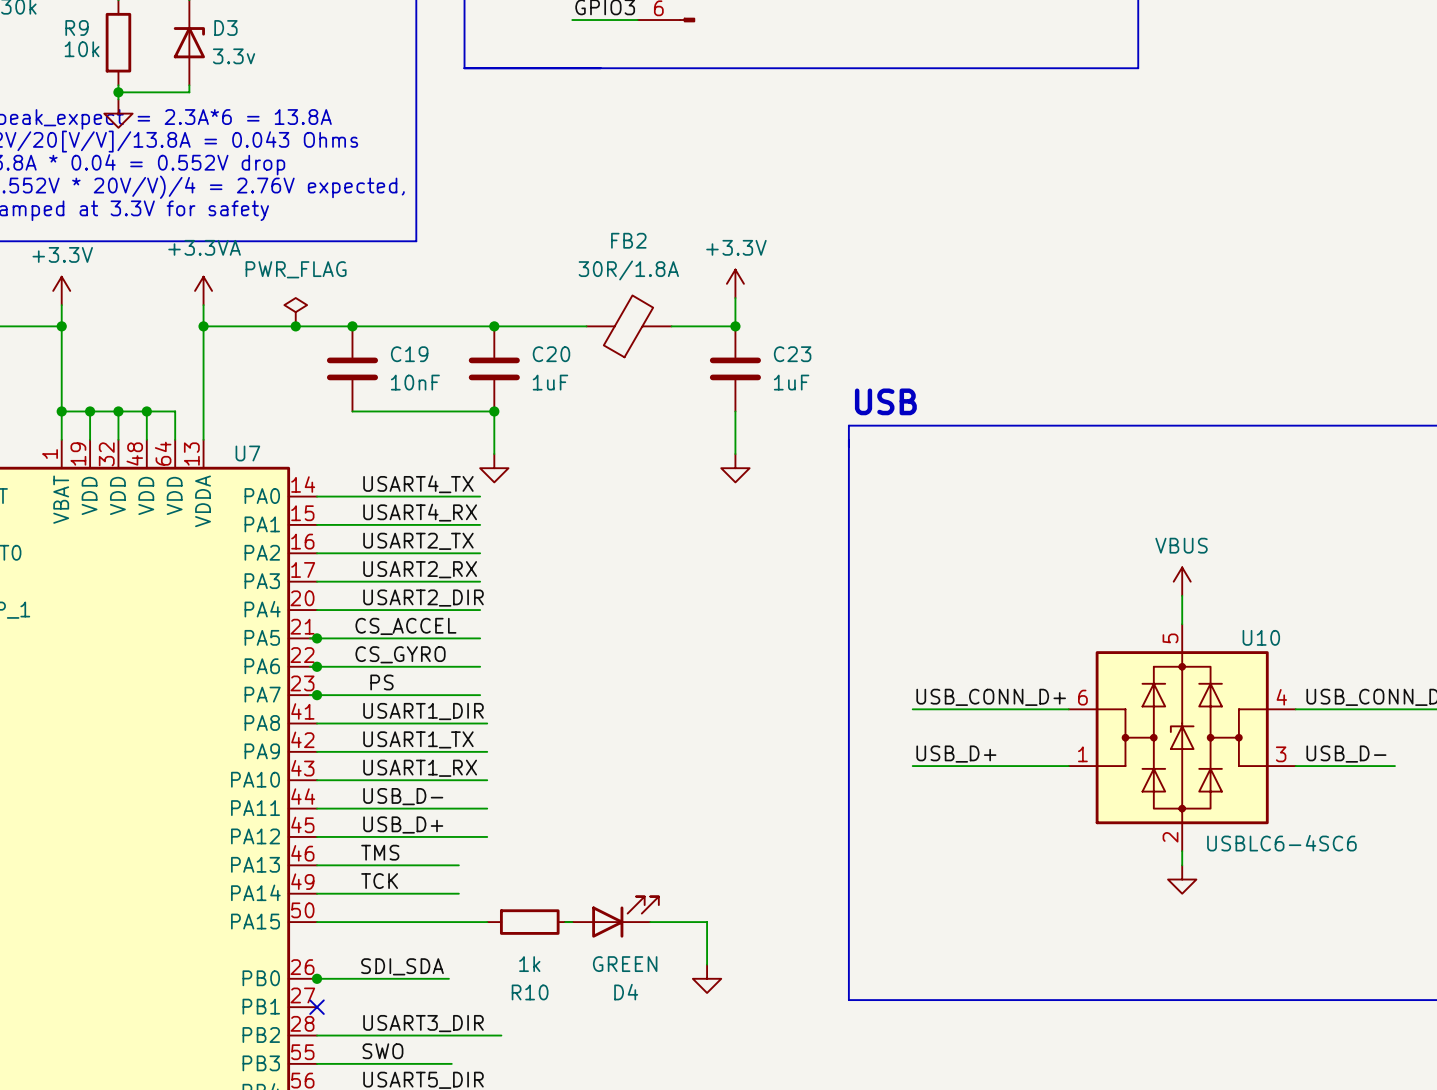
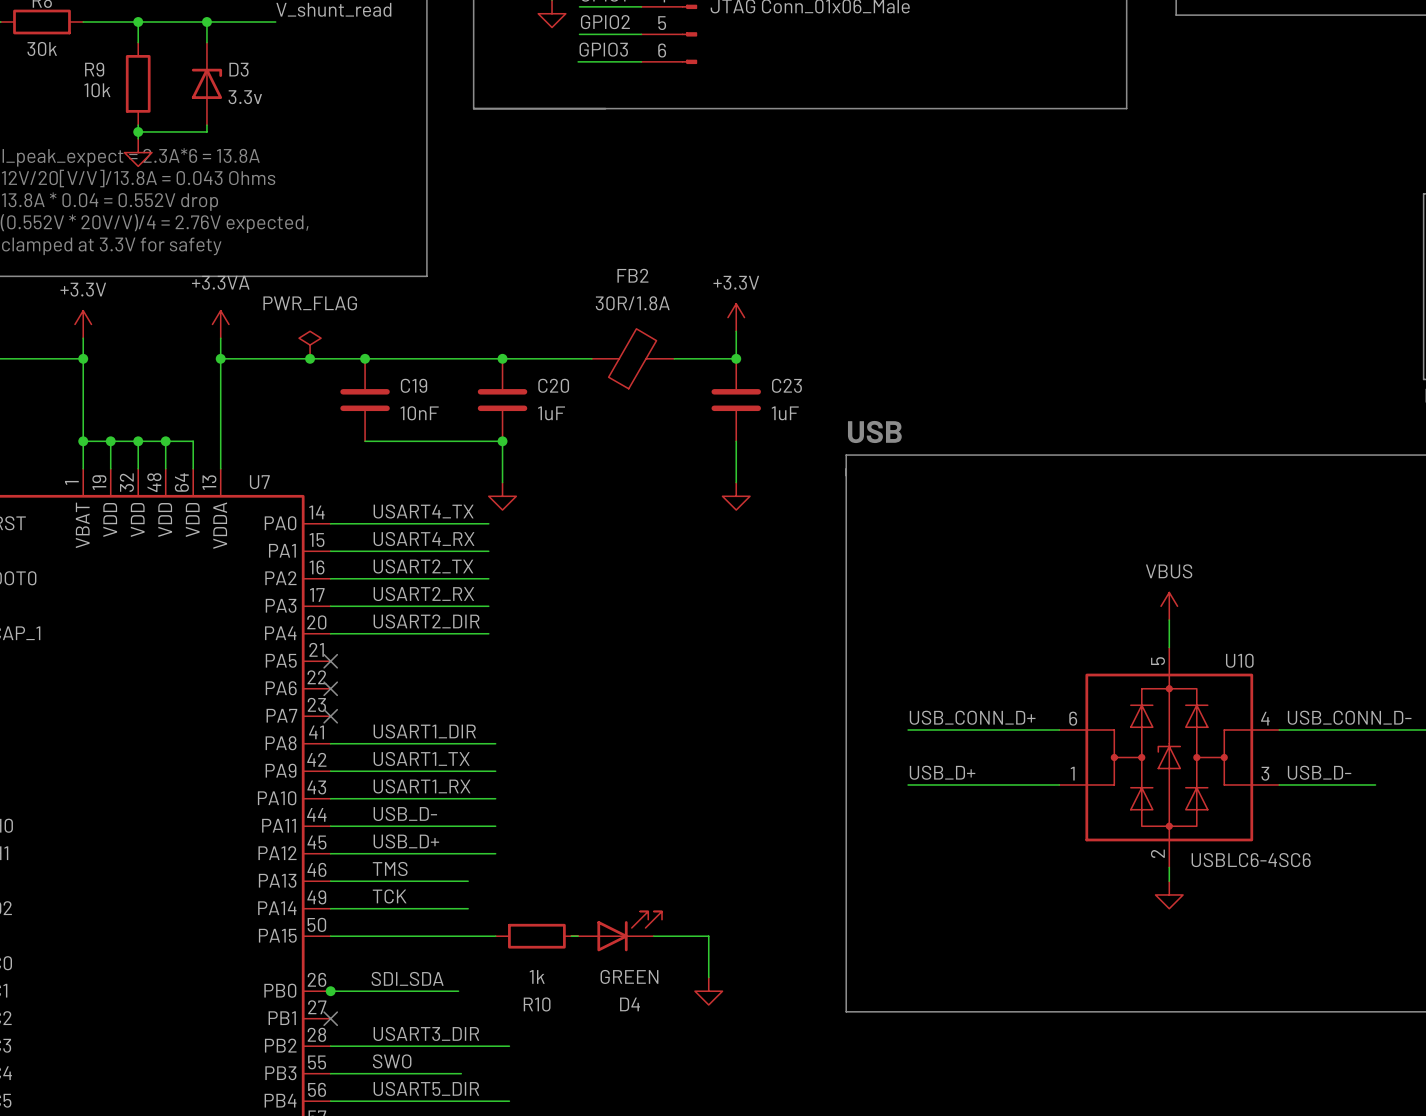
label: CS_ACCEL (405, 626) -> none
wire: (309, 638) (480, 638) -> none
junction: (317, 638) -> none
no-connect mark: none -> (330, 661)
label: CS_GYRO (400, 654) -> none
wire: (309, 666) (480, 666) -> none
junction: (317, 666) -> none
no-connect mark: none -> (330, 688)
label: PS (381, 682) -> none
wire: (309, 695) (480, 695) -> none
junction: (317, 695) -> none
no-connect mark: none -> (330, 716)

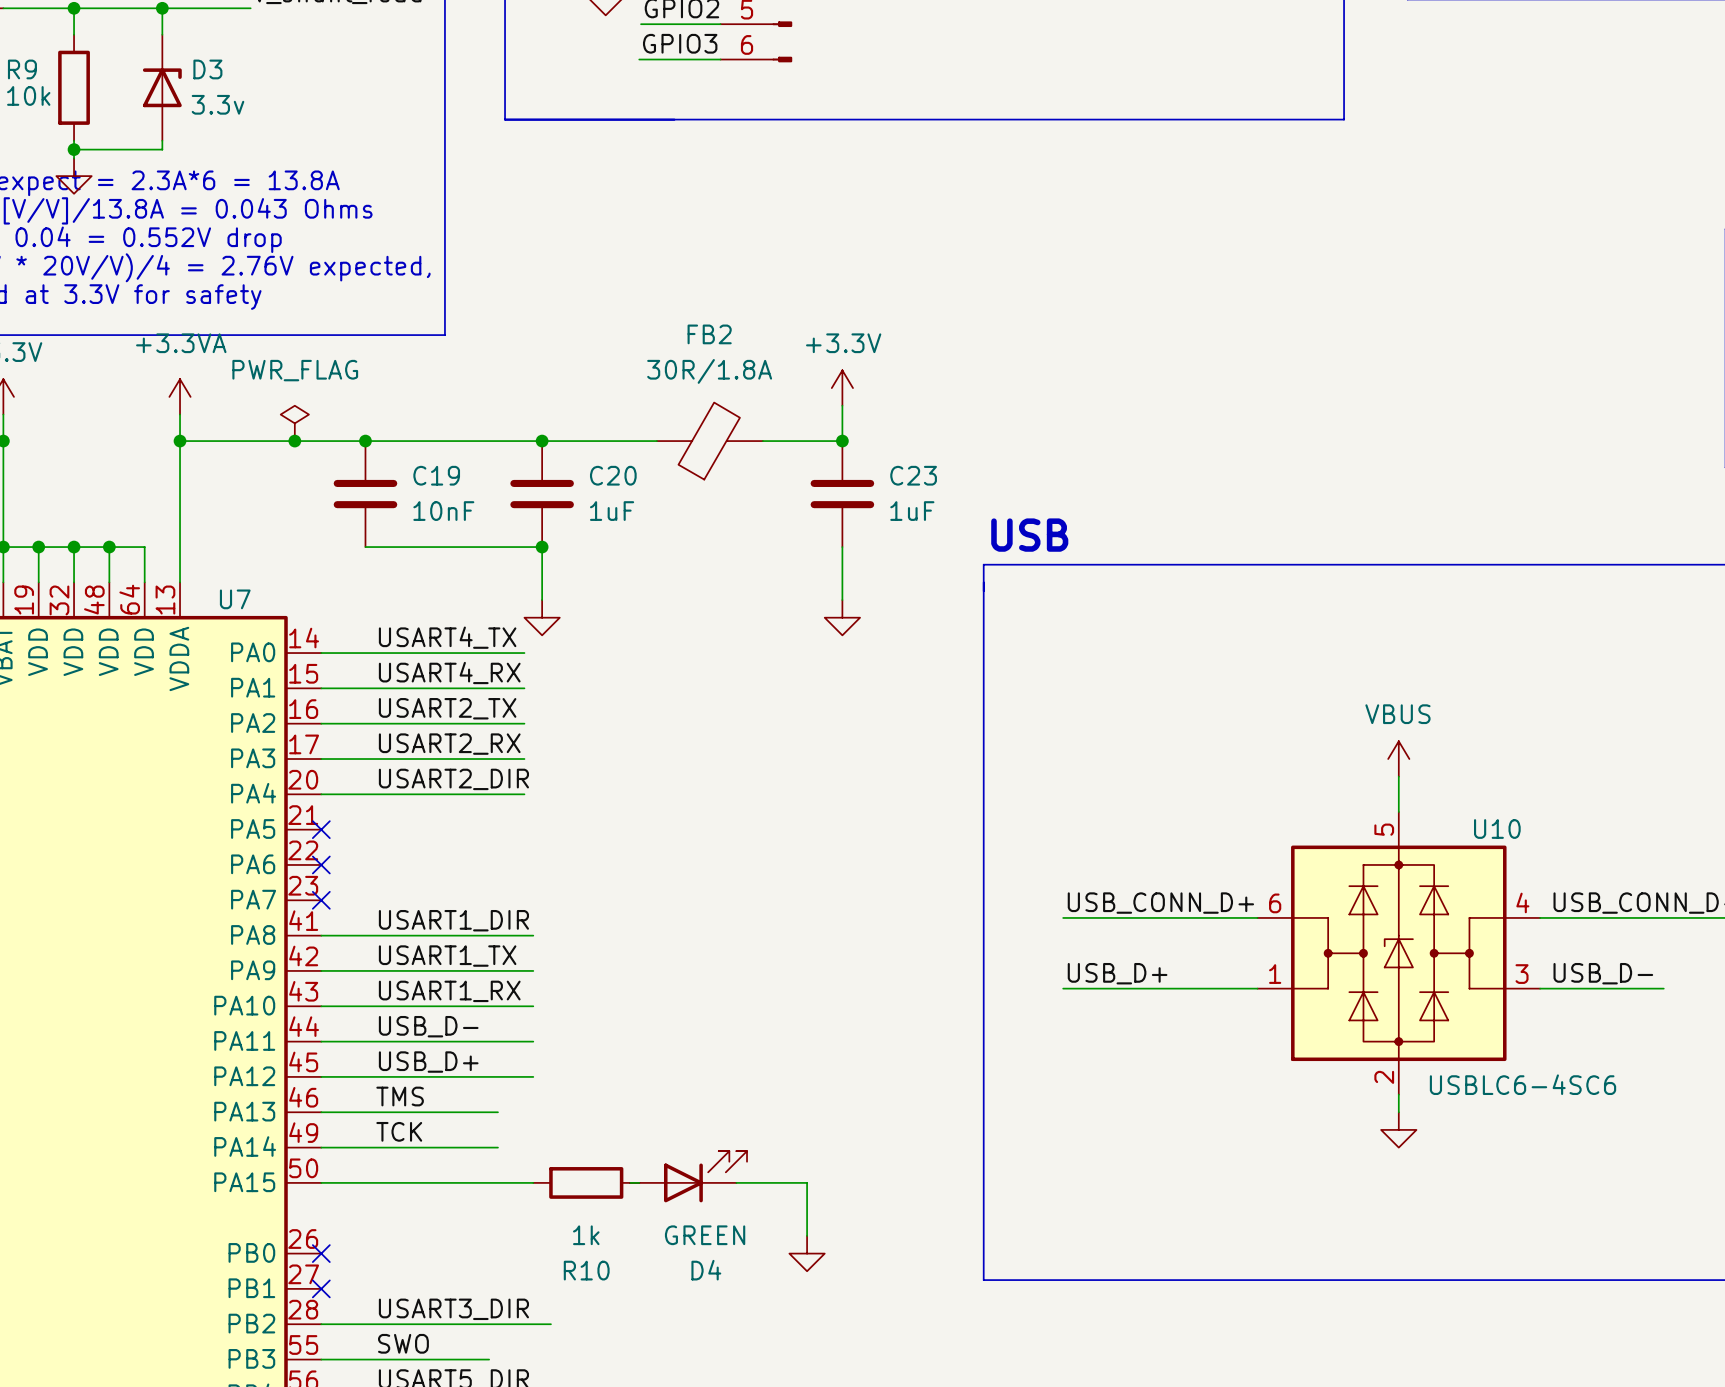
label: SDI_SDA (407, 978) -> none
wire: (329, 991) (458, 991) -> none
junction: (330, 991) -> none
no-connect mark: none -> (321, 1253)

